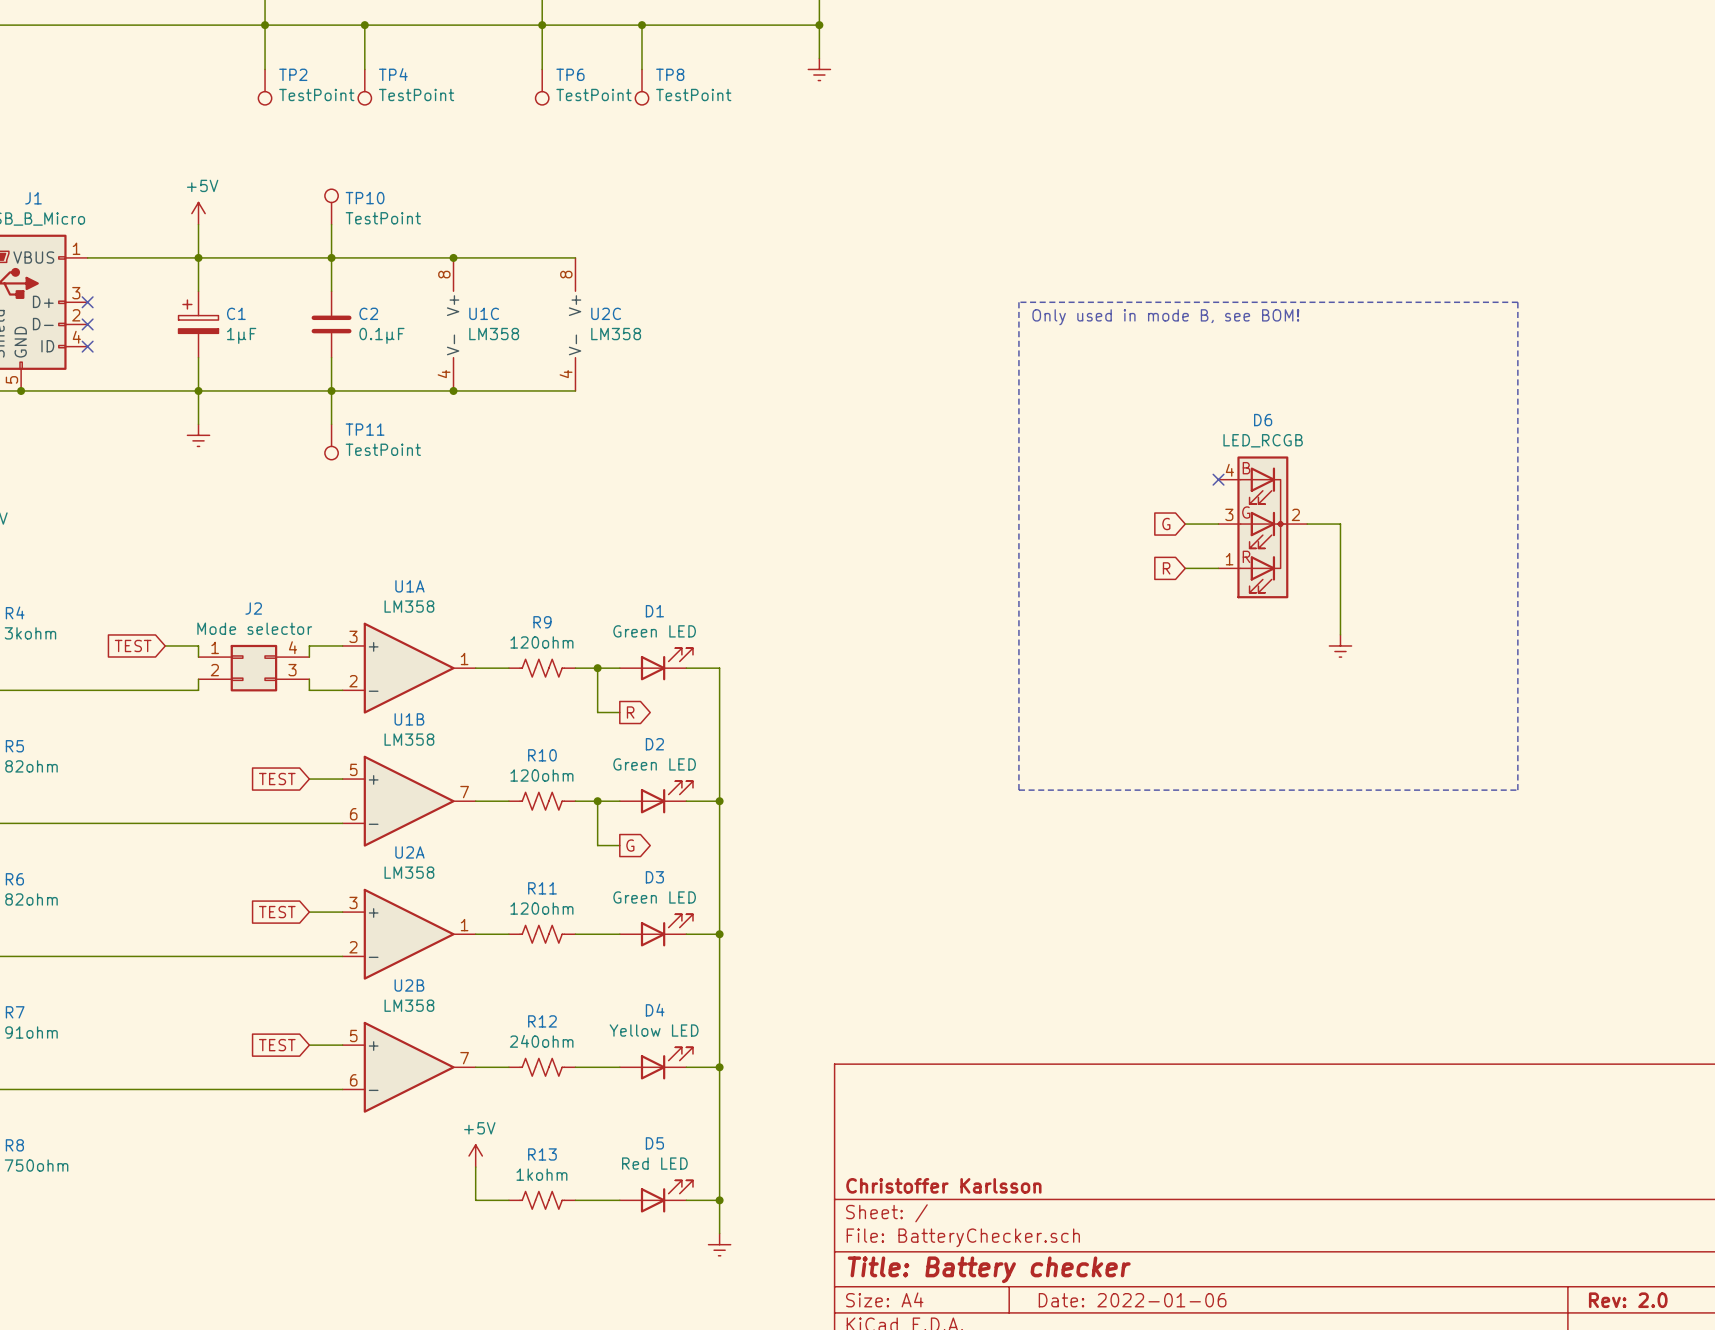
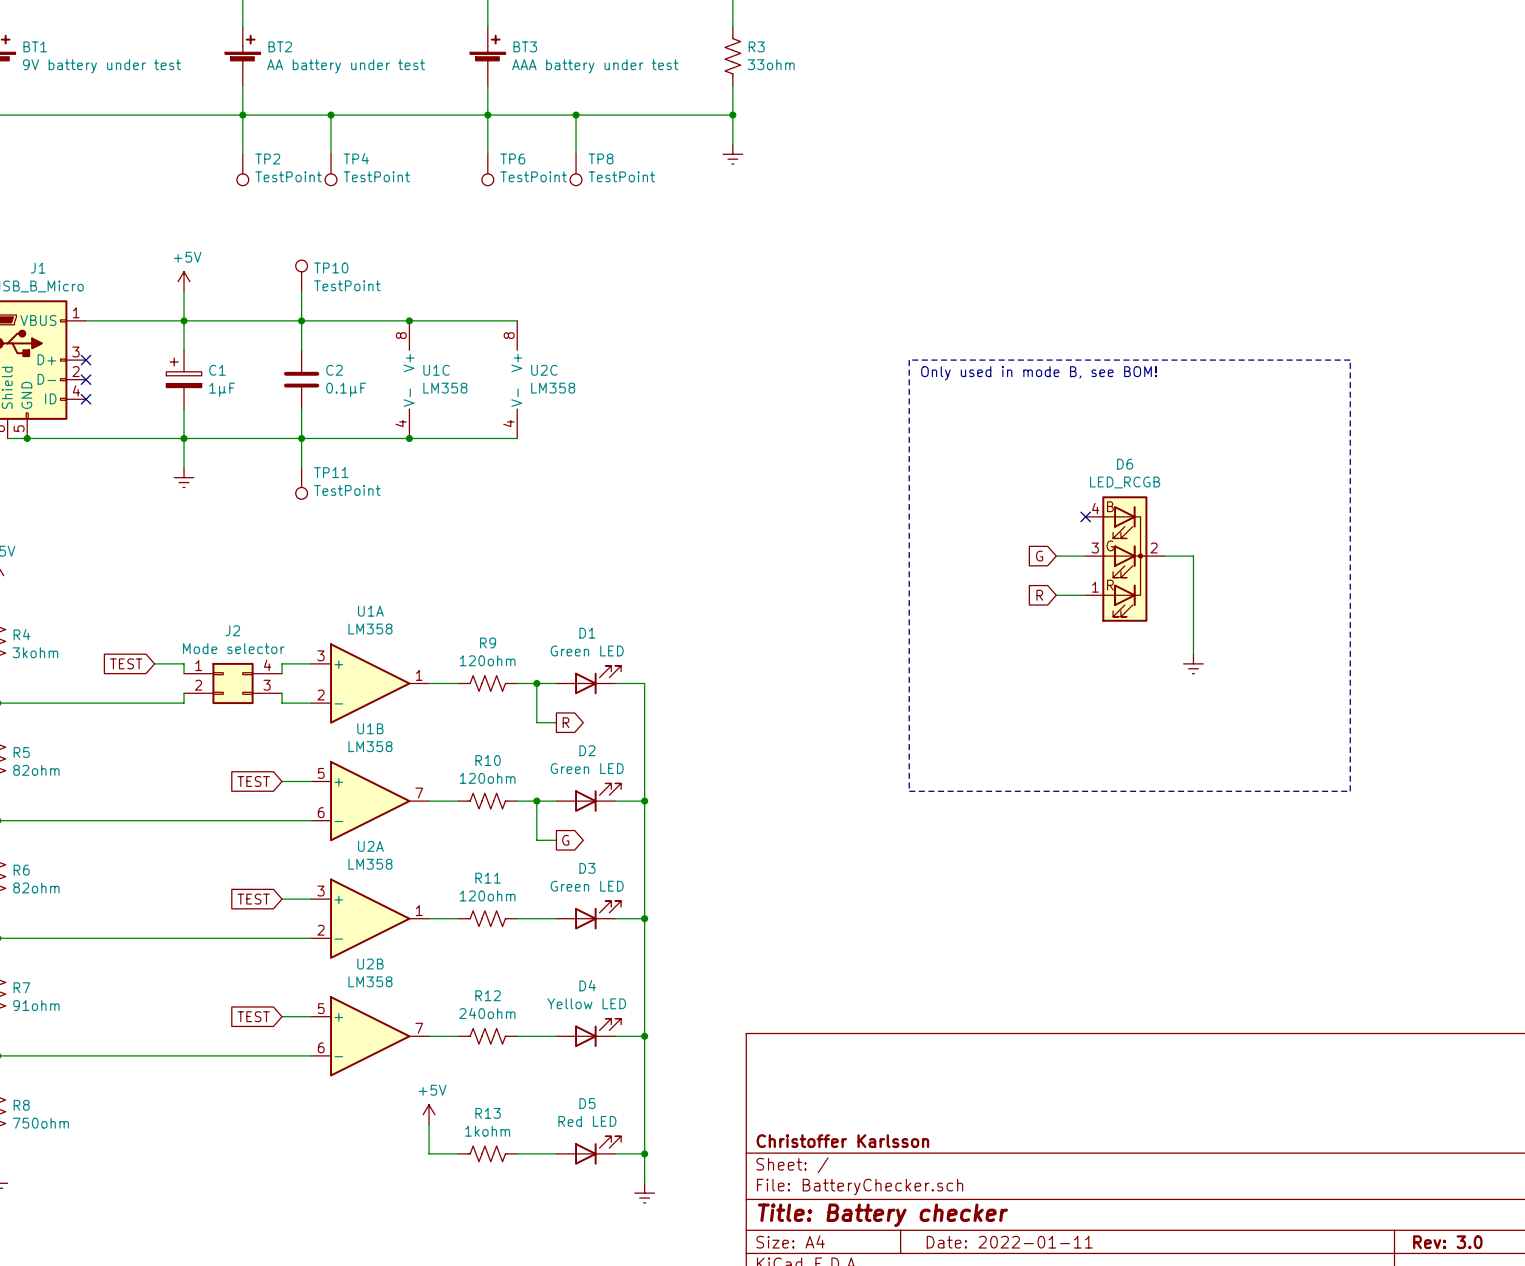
title block: Date: 2022-01-06 (1132, 1300) -> Date: 2022-01-11 (1009, 1242)
title block: Rev: 2.0 (1628, 1300) -> Rev: 3.0 (1447, 1242)

